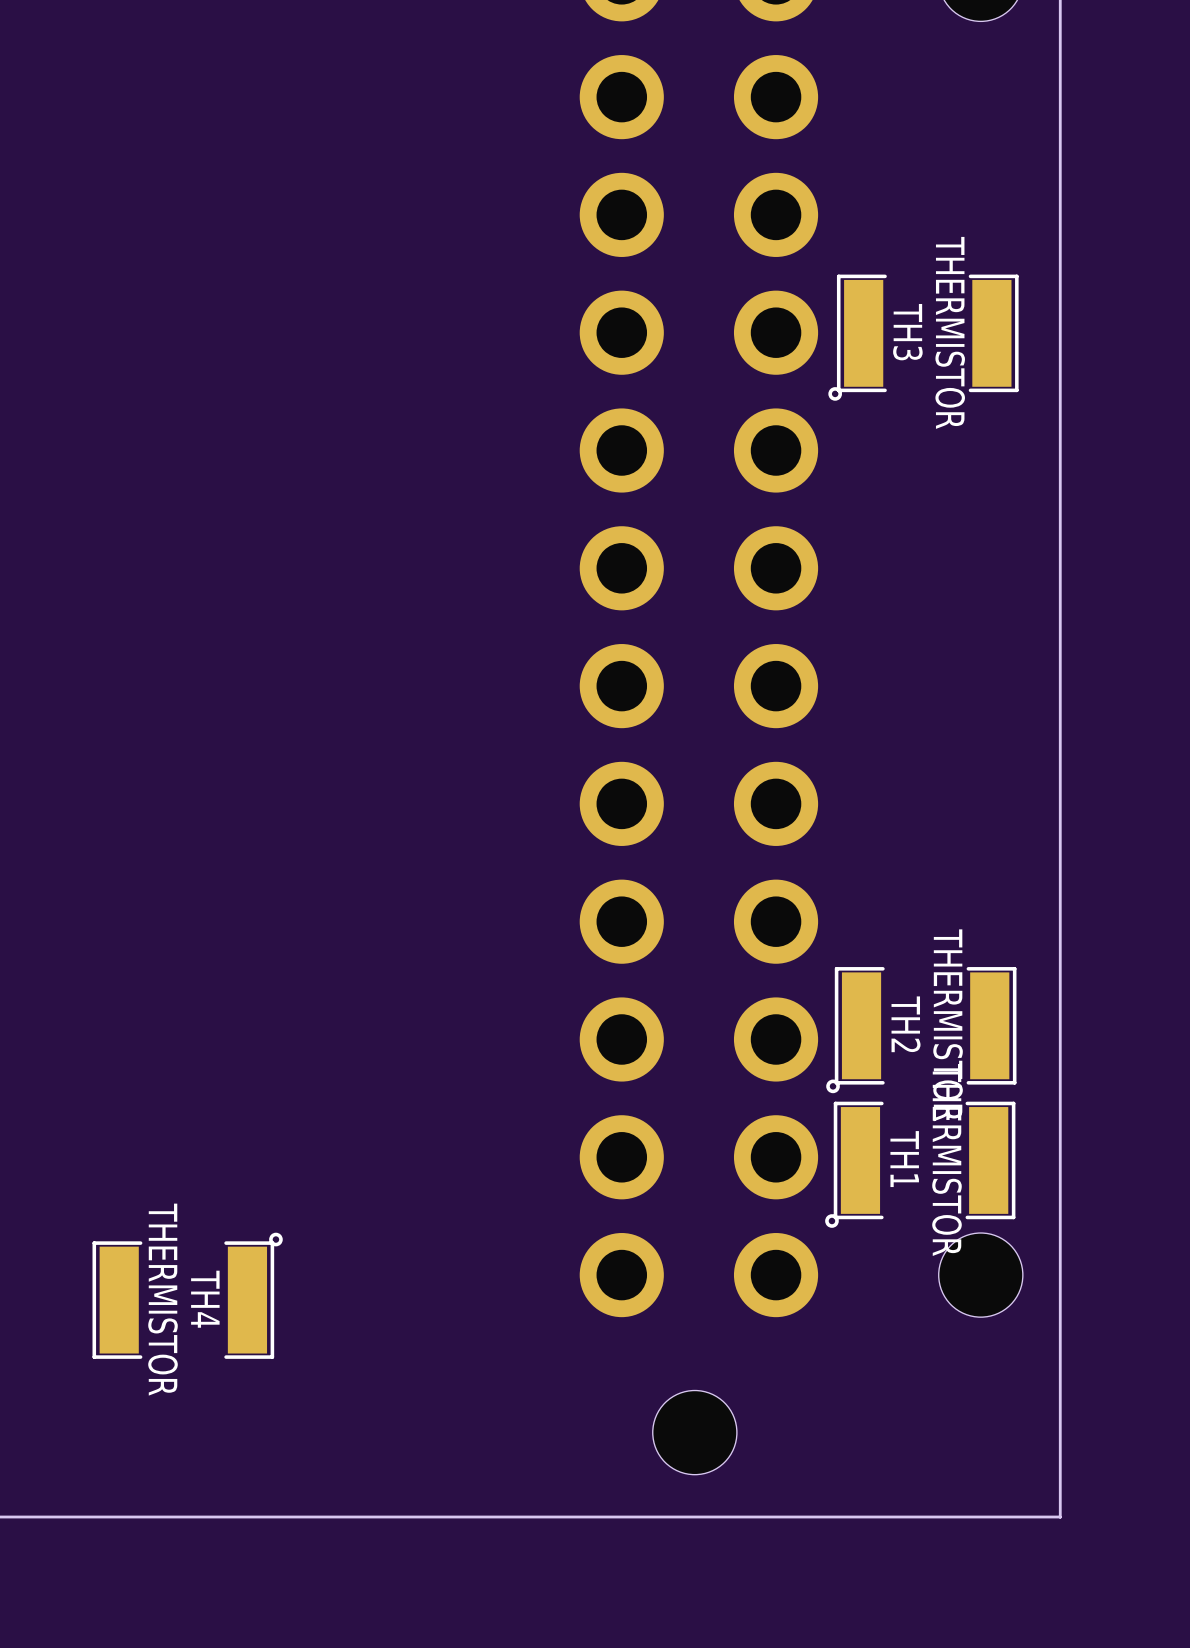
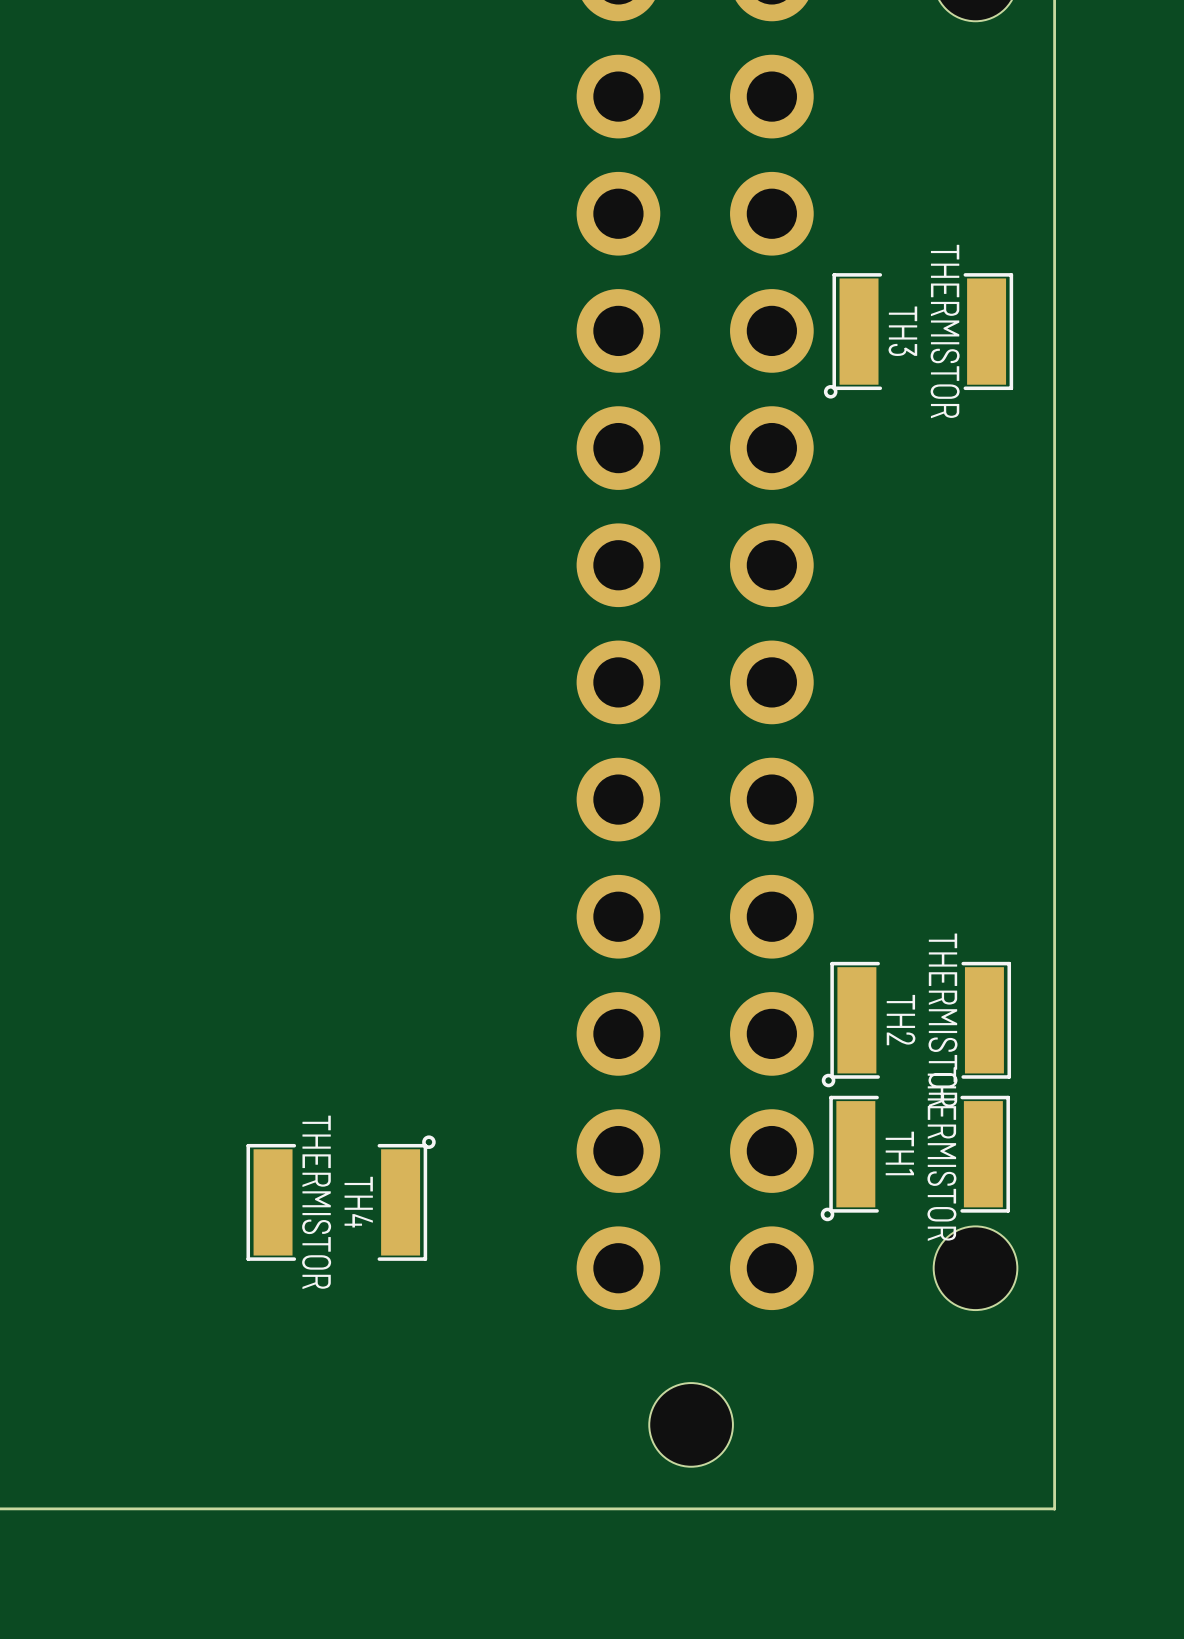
TH4 position: (187, 1295) -> (341, 1198)

